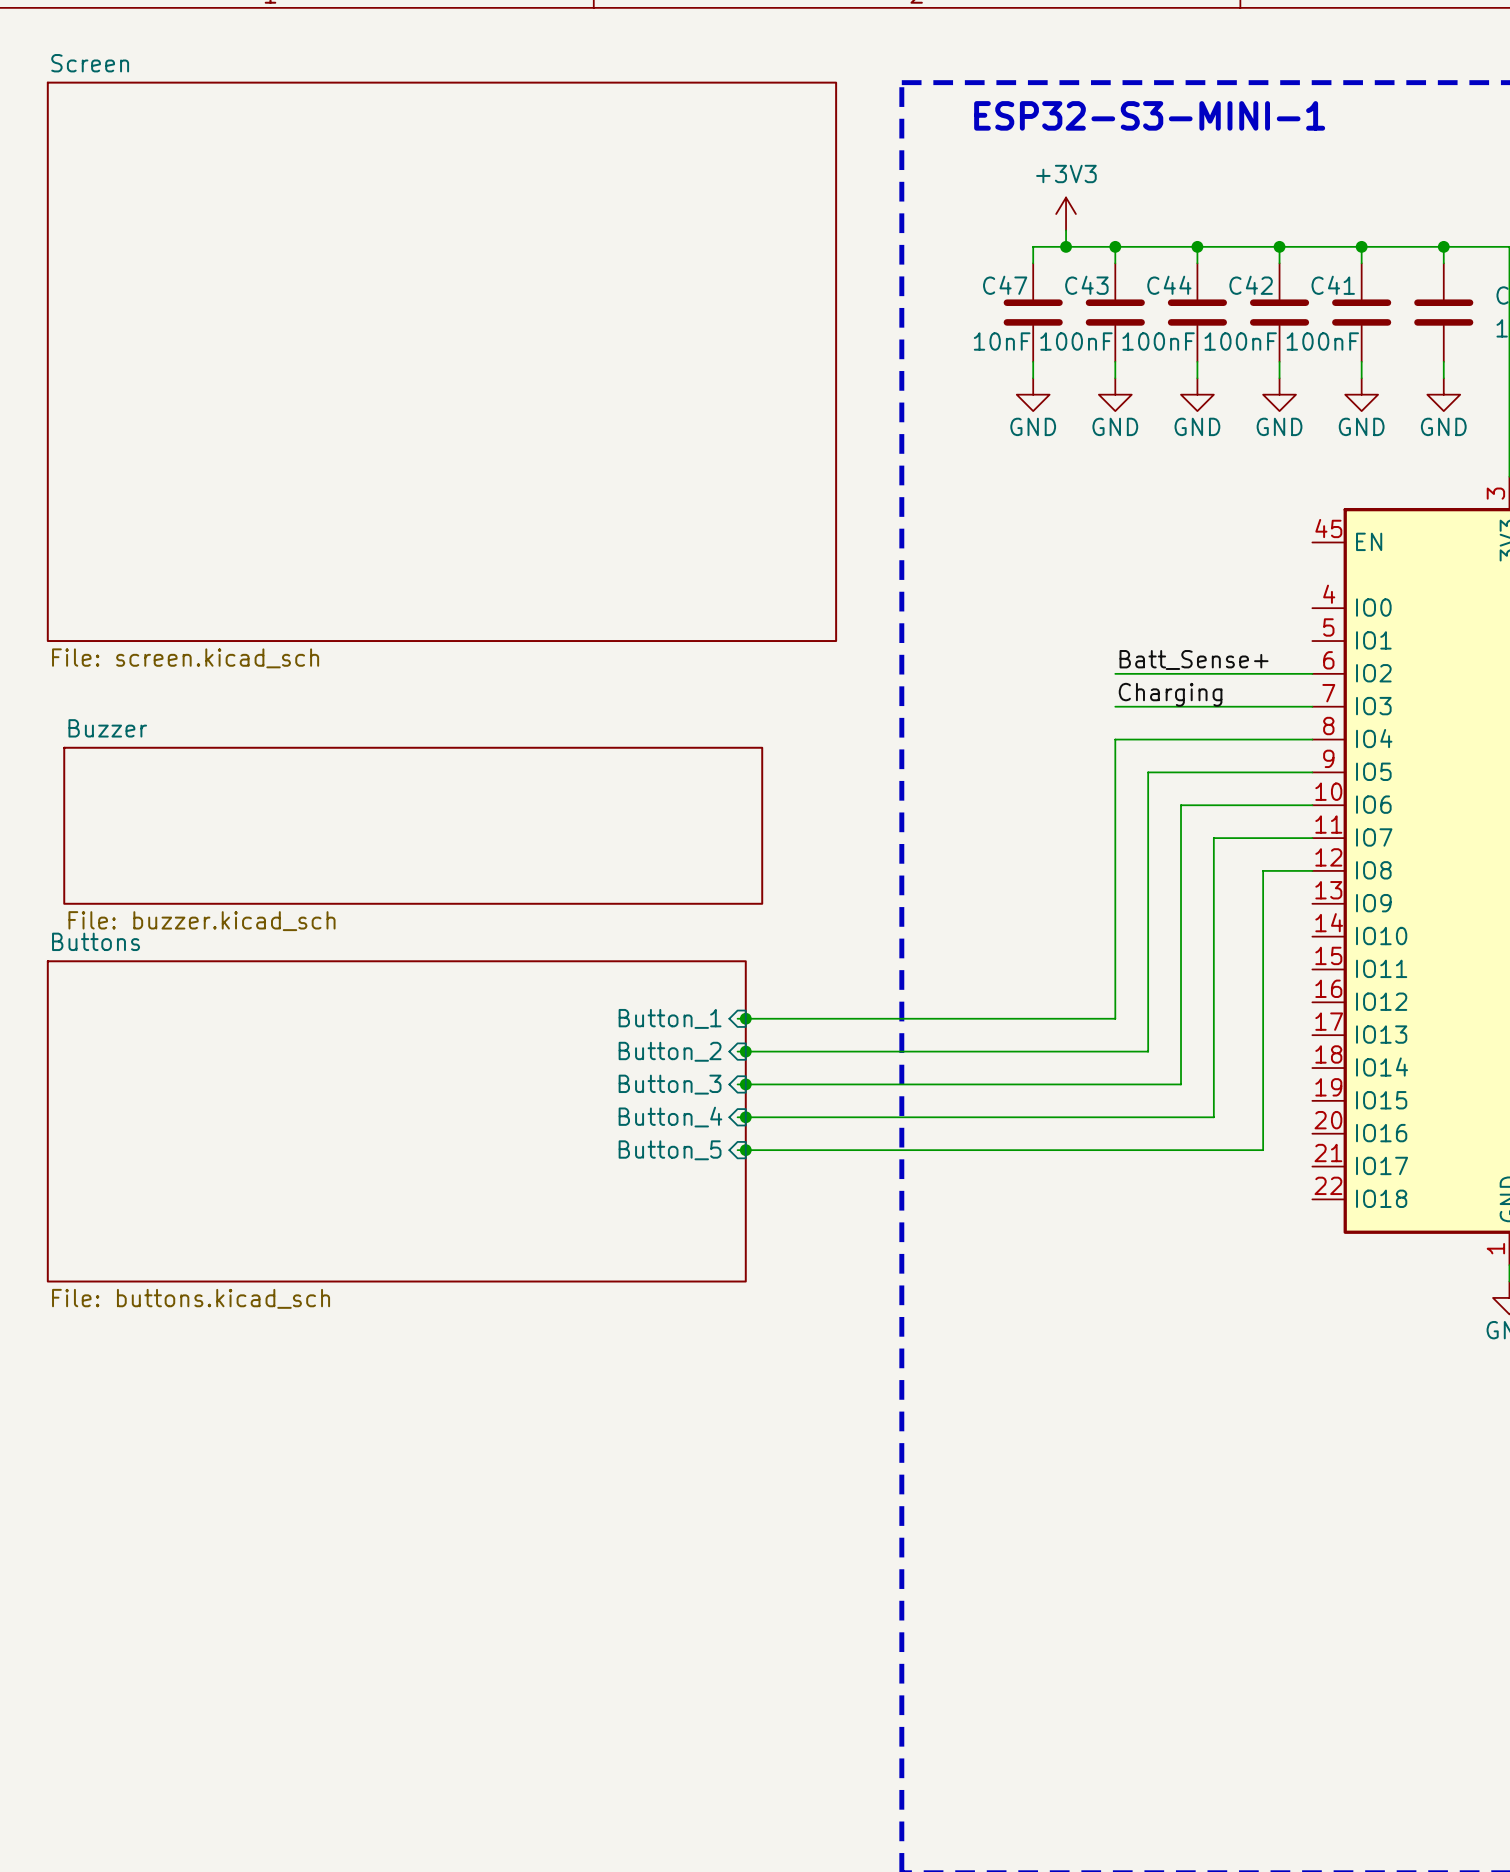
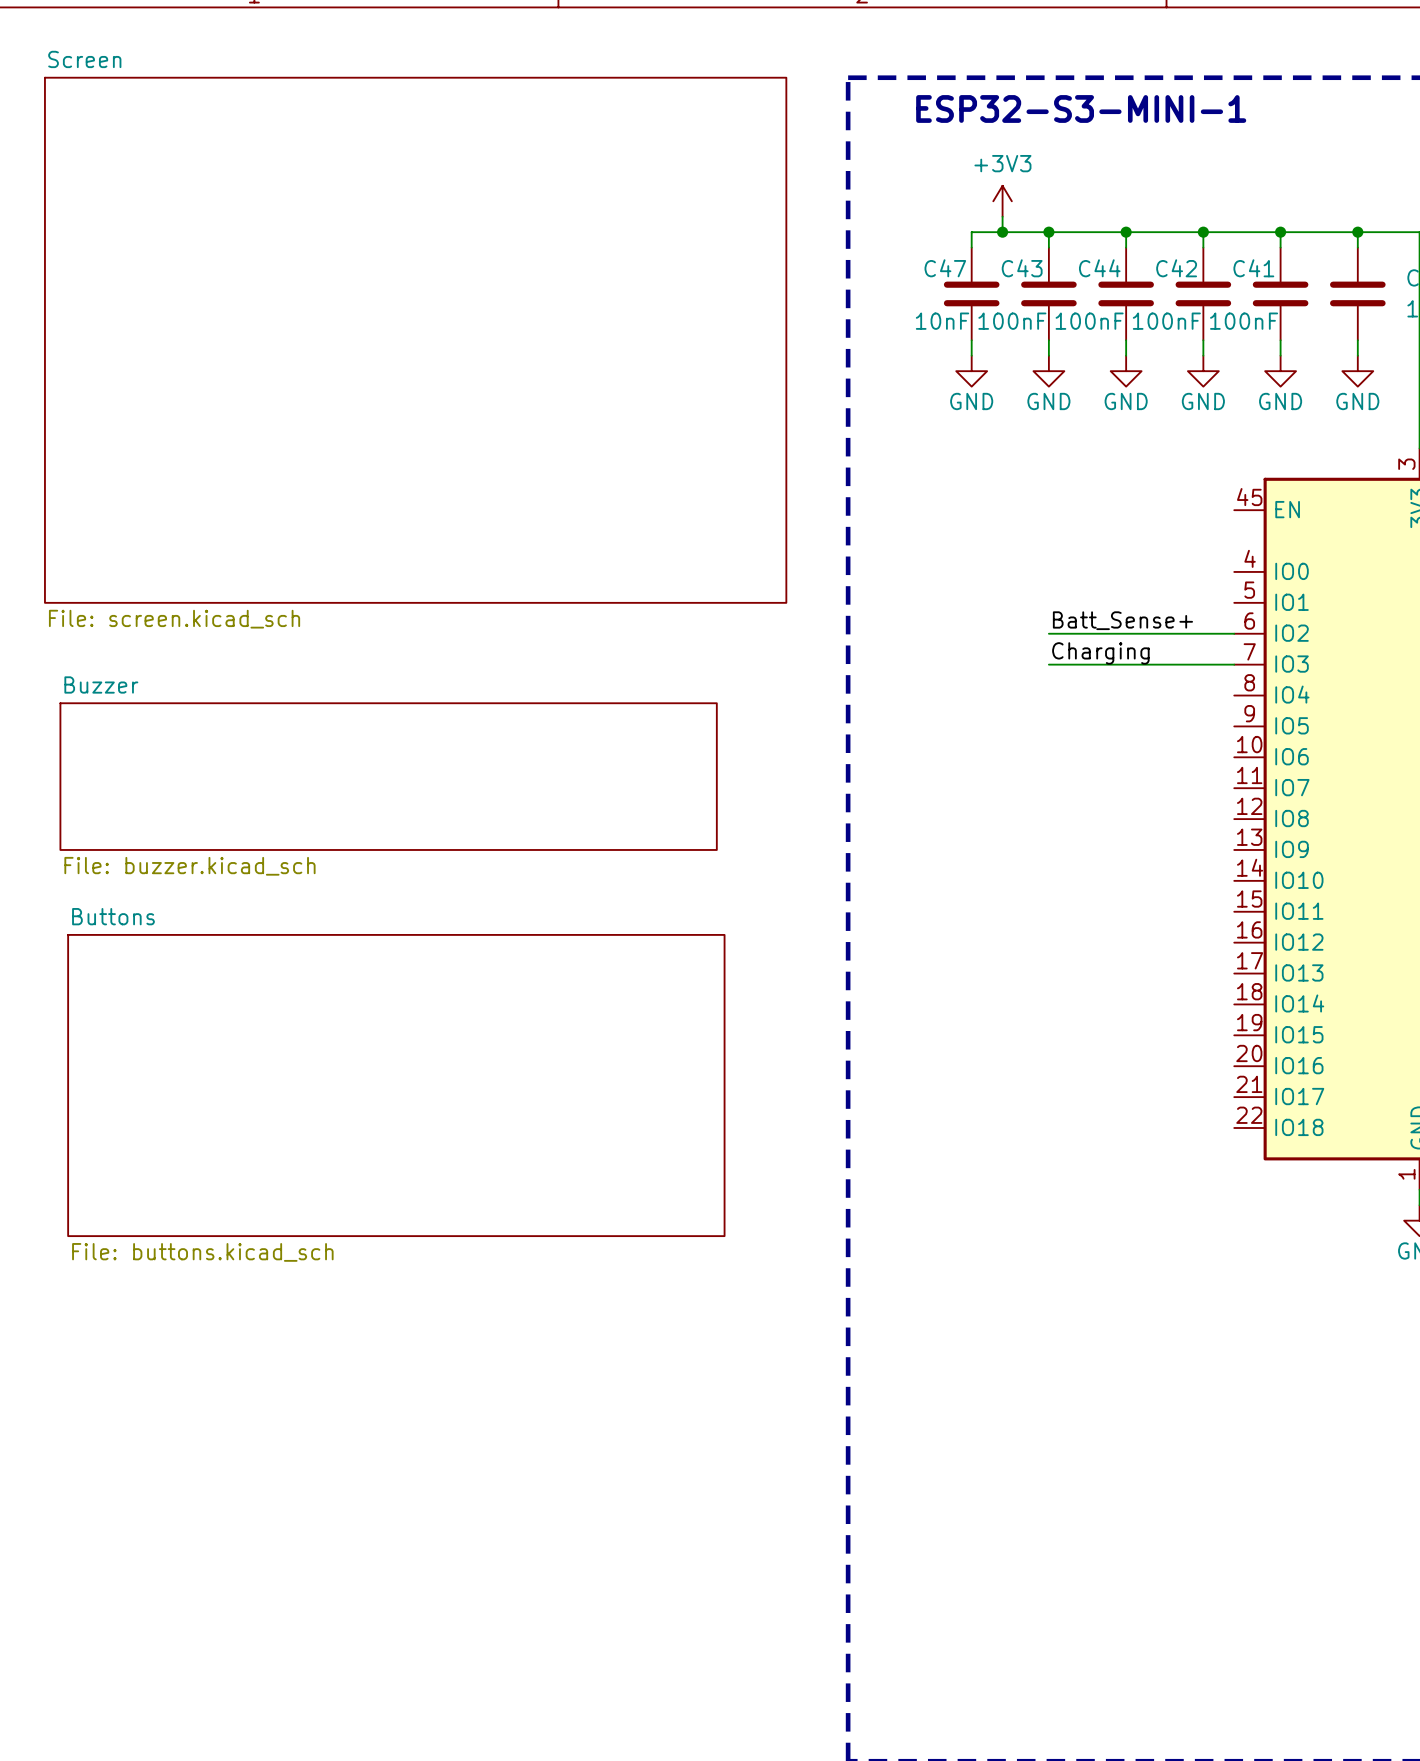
wire: (1312, 739) (1115, 739) (1115, 1018) (737, 1018) -> none
wire: (1312, 772) (1148, 772) (1148, 1051) (737, 1051) -> none
wire: (1312, 805) (1181, 805) (1181, 1084) (737, 1084) -> none
wire: (1312, 838) (1213, 838) (1213, 1117) (737, 1117) -> none
wire: (1312, 870) (1263, 870) (1263, 1150) (737, 1150) -> none
sheet pin: Button_1 (670, 1018) -> none
junction: (745, 1018) -> none
sheet pin: Button_2 (670, 1051) -> none
junction: (745, 1051) -> none
sheet pin: Button_3 (670, 1084) -> none
junction: (745, 1084) -> none
sheet pin: Button_4 (670, 1117) -> none
junction: (745, 1117) -> none
sheet Buttons position: (396, 1121) -> (396, 1085)
sheet pin: Button_5 (670, 1150) -> none
junction: (745, 1150) -> none

